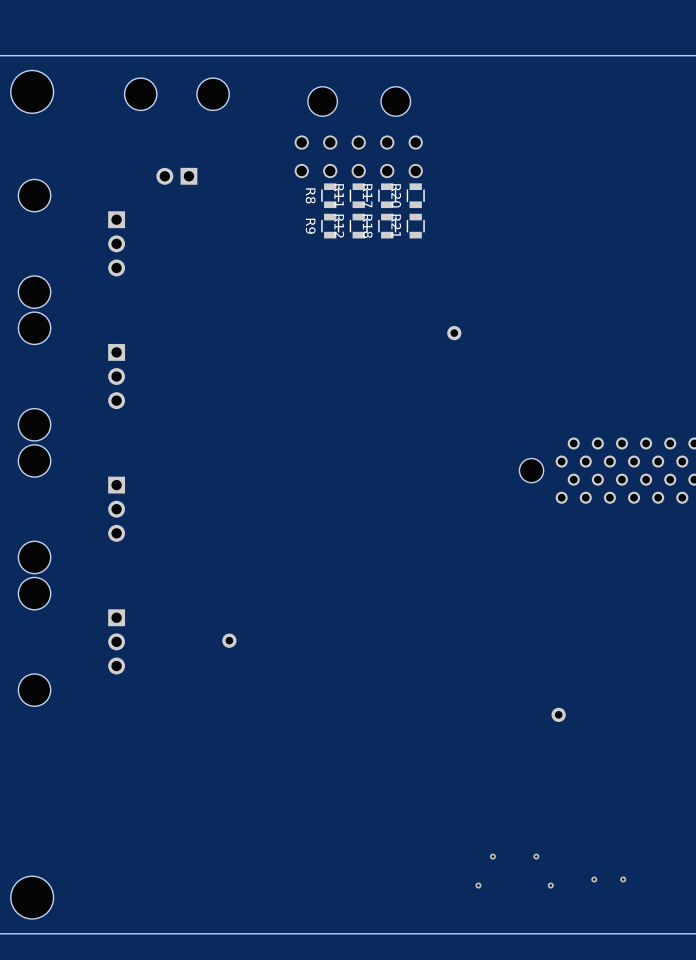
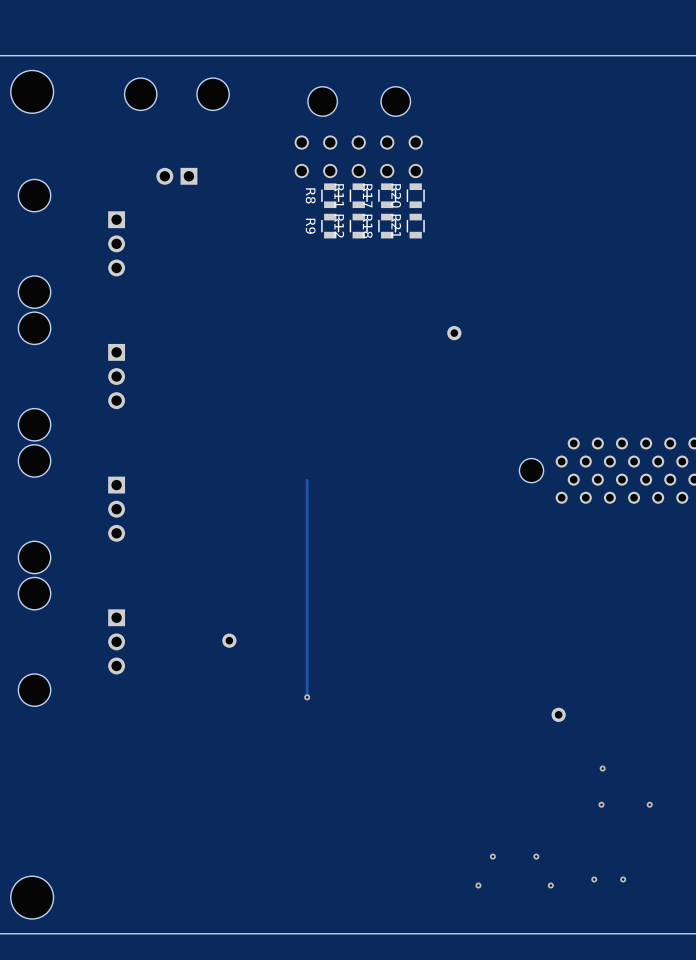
track: none -> (307, 480) (307, 697)
via: none -> (307, 697)
via: none -> (602, 768)
via: none -> (601, 804)
via: none -> (649, 804)

